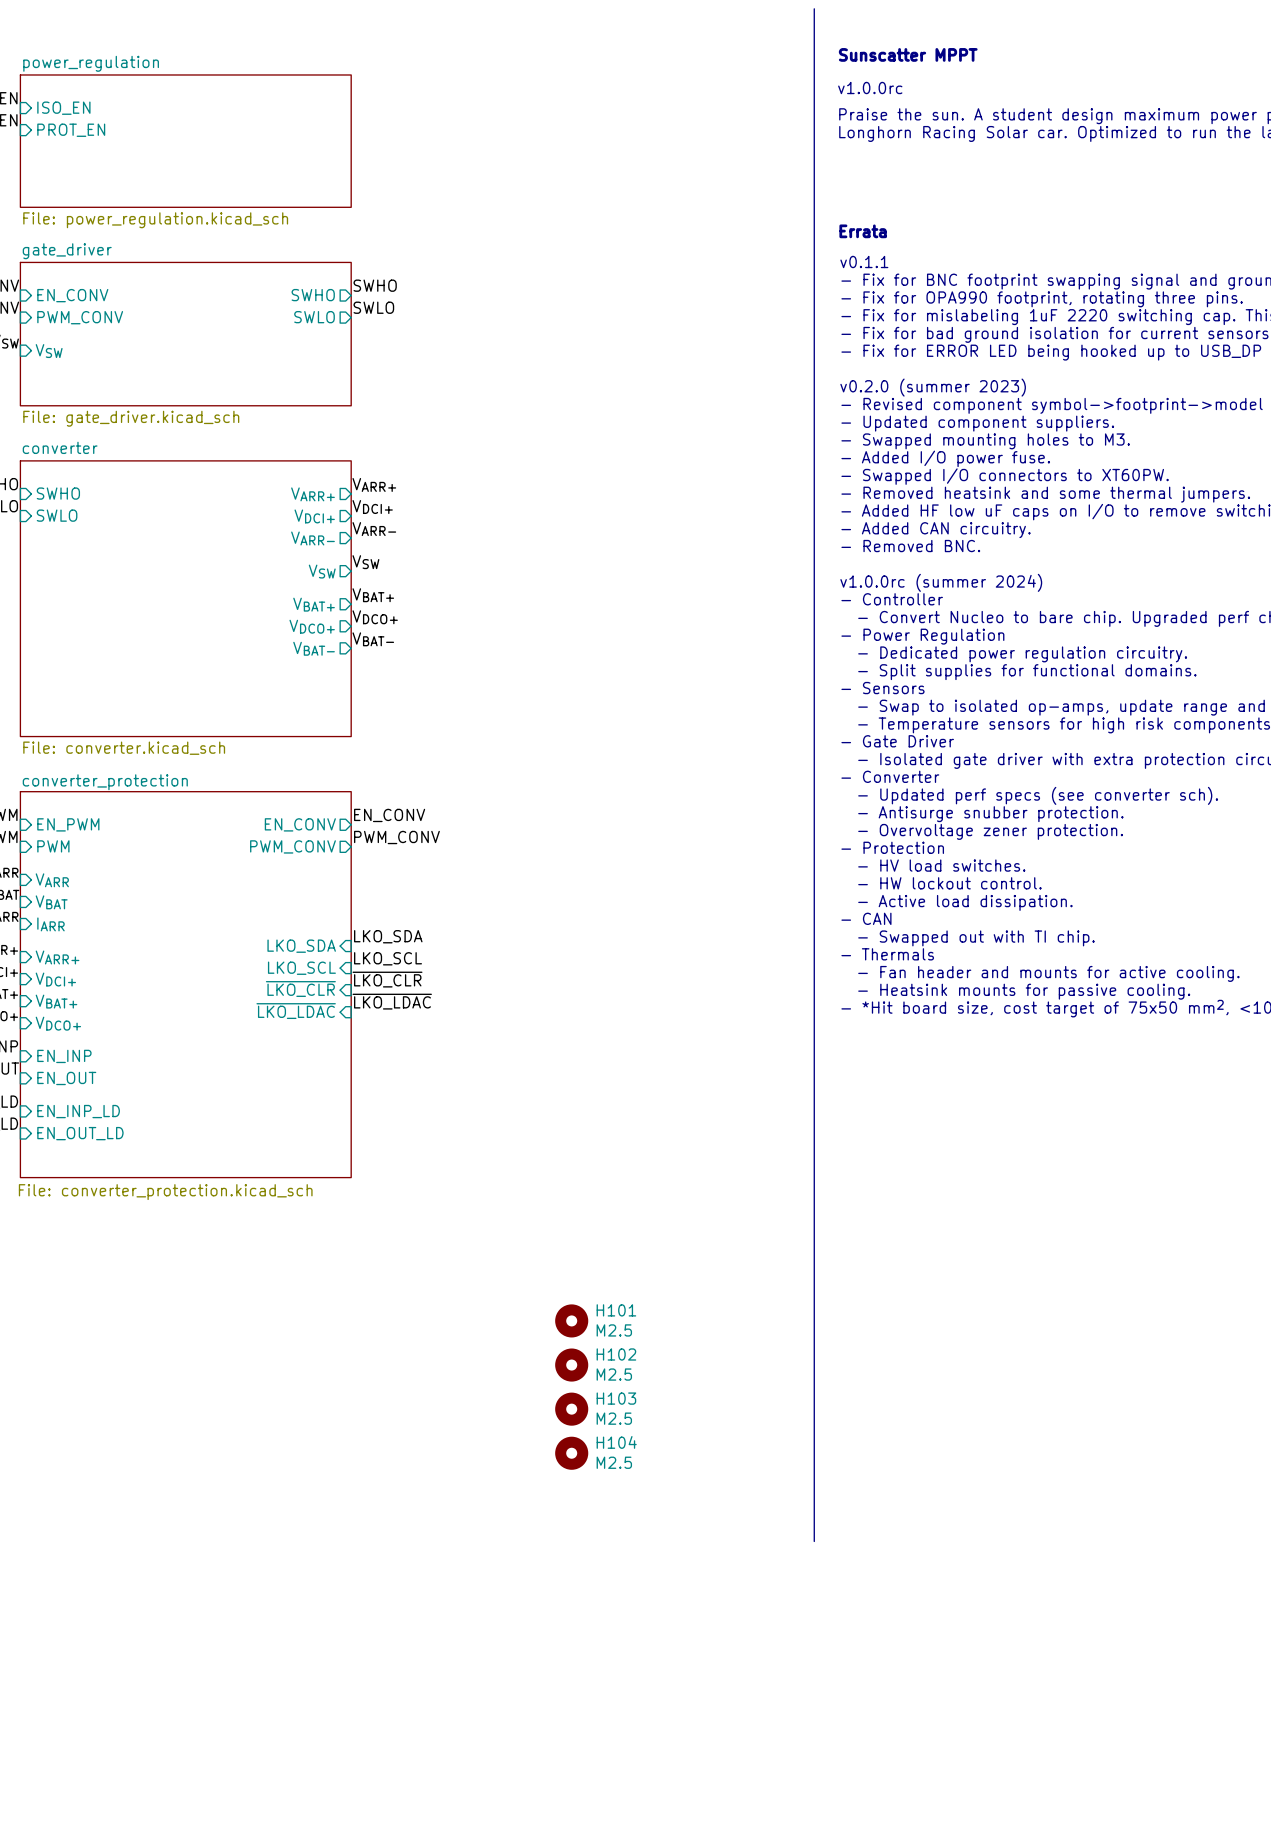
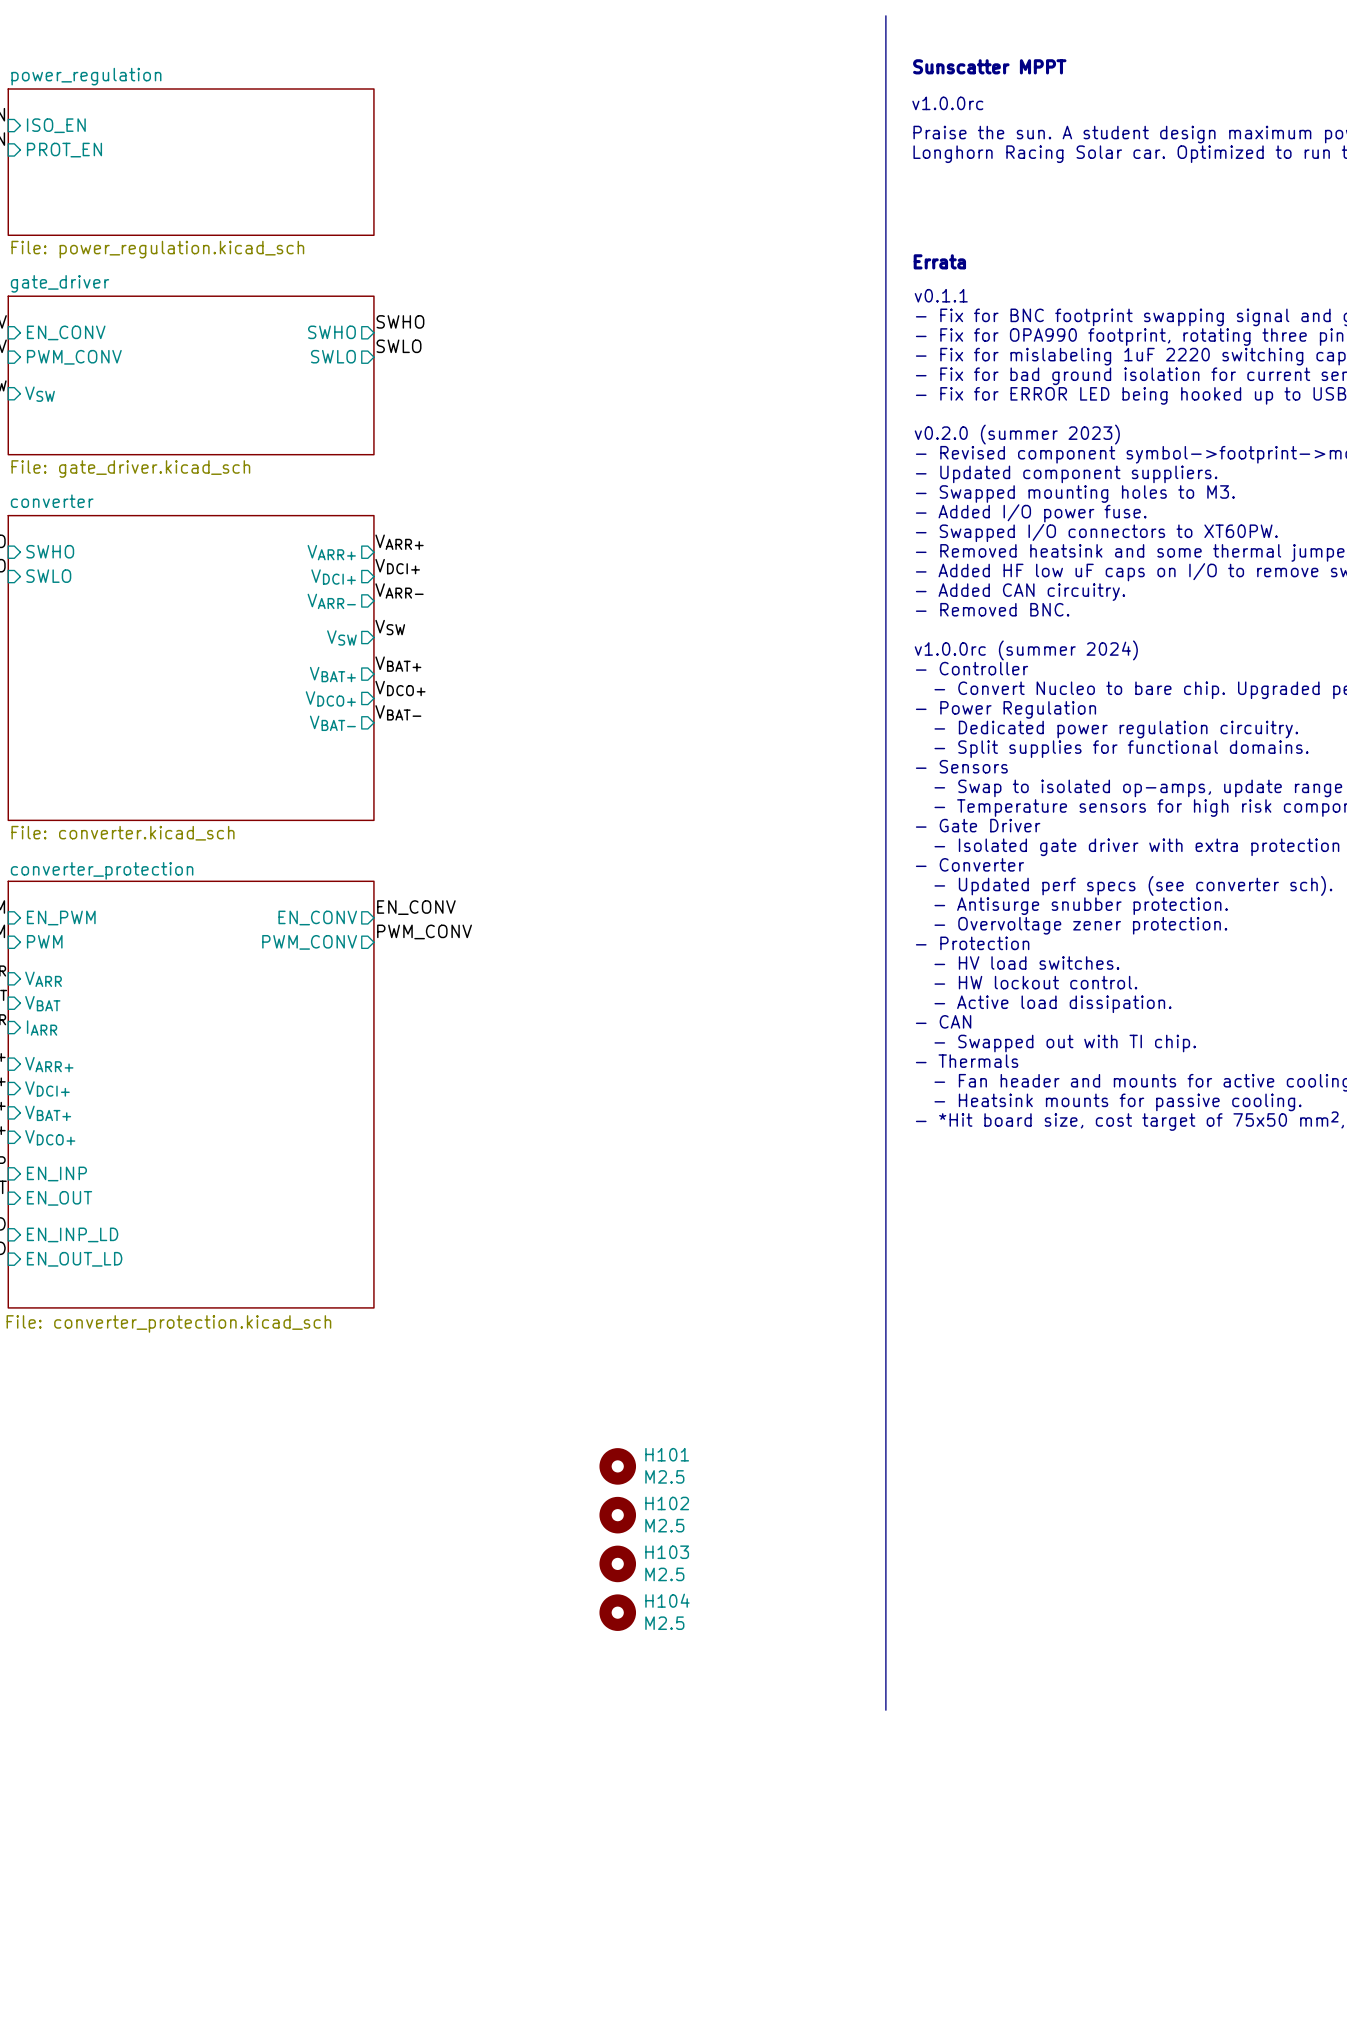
label: LKO_SDA (388, 936) -> none
sheet pin: LKO_SDA (301, 946) -> none
label: LKO_SCL (388, 958) -> none
sheet pin: LKO_SCL (301, 968) -> none
label: ~{LKO_CLR} (387, 979) -> none
sheet pin: ~{LKO_CLR} (300, 989) -> none
label: ~{LKO_LDAC} (392, 1001) -> none
sheet pin: ~{LKO_LDAC} (296, 1011) -> none

